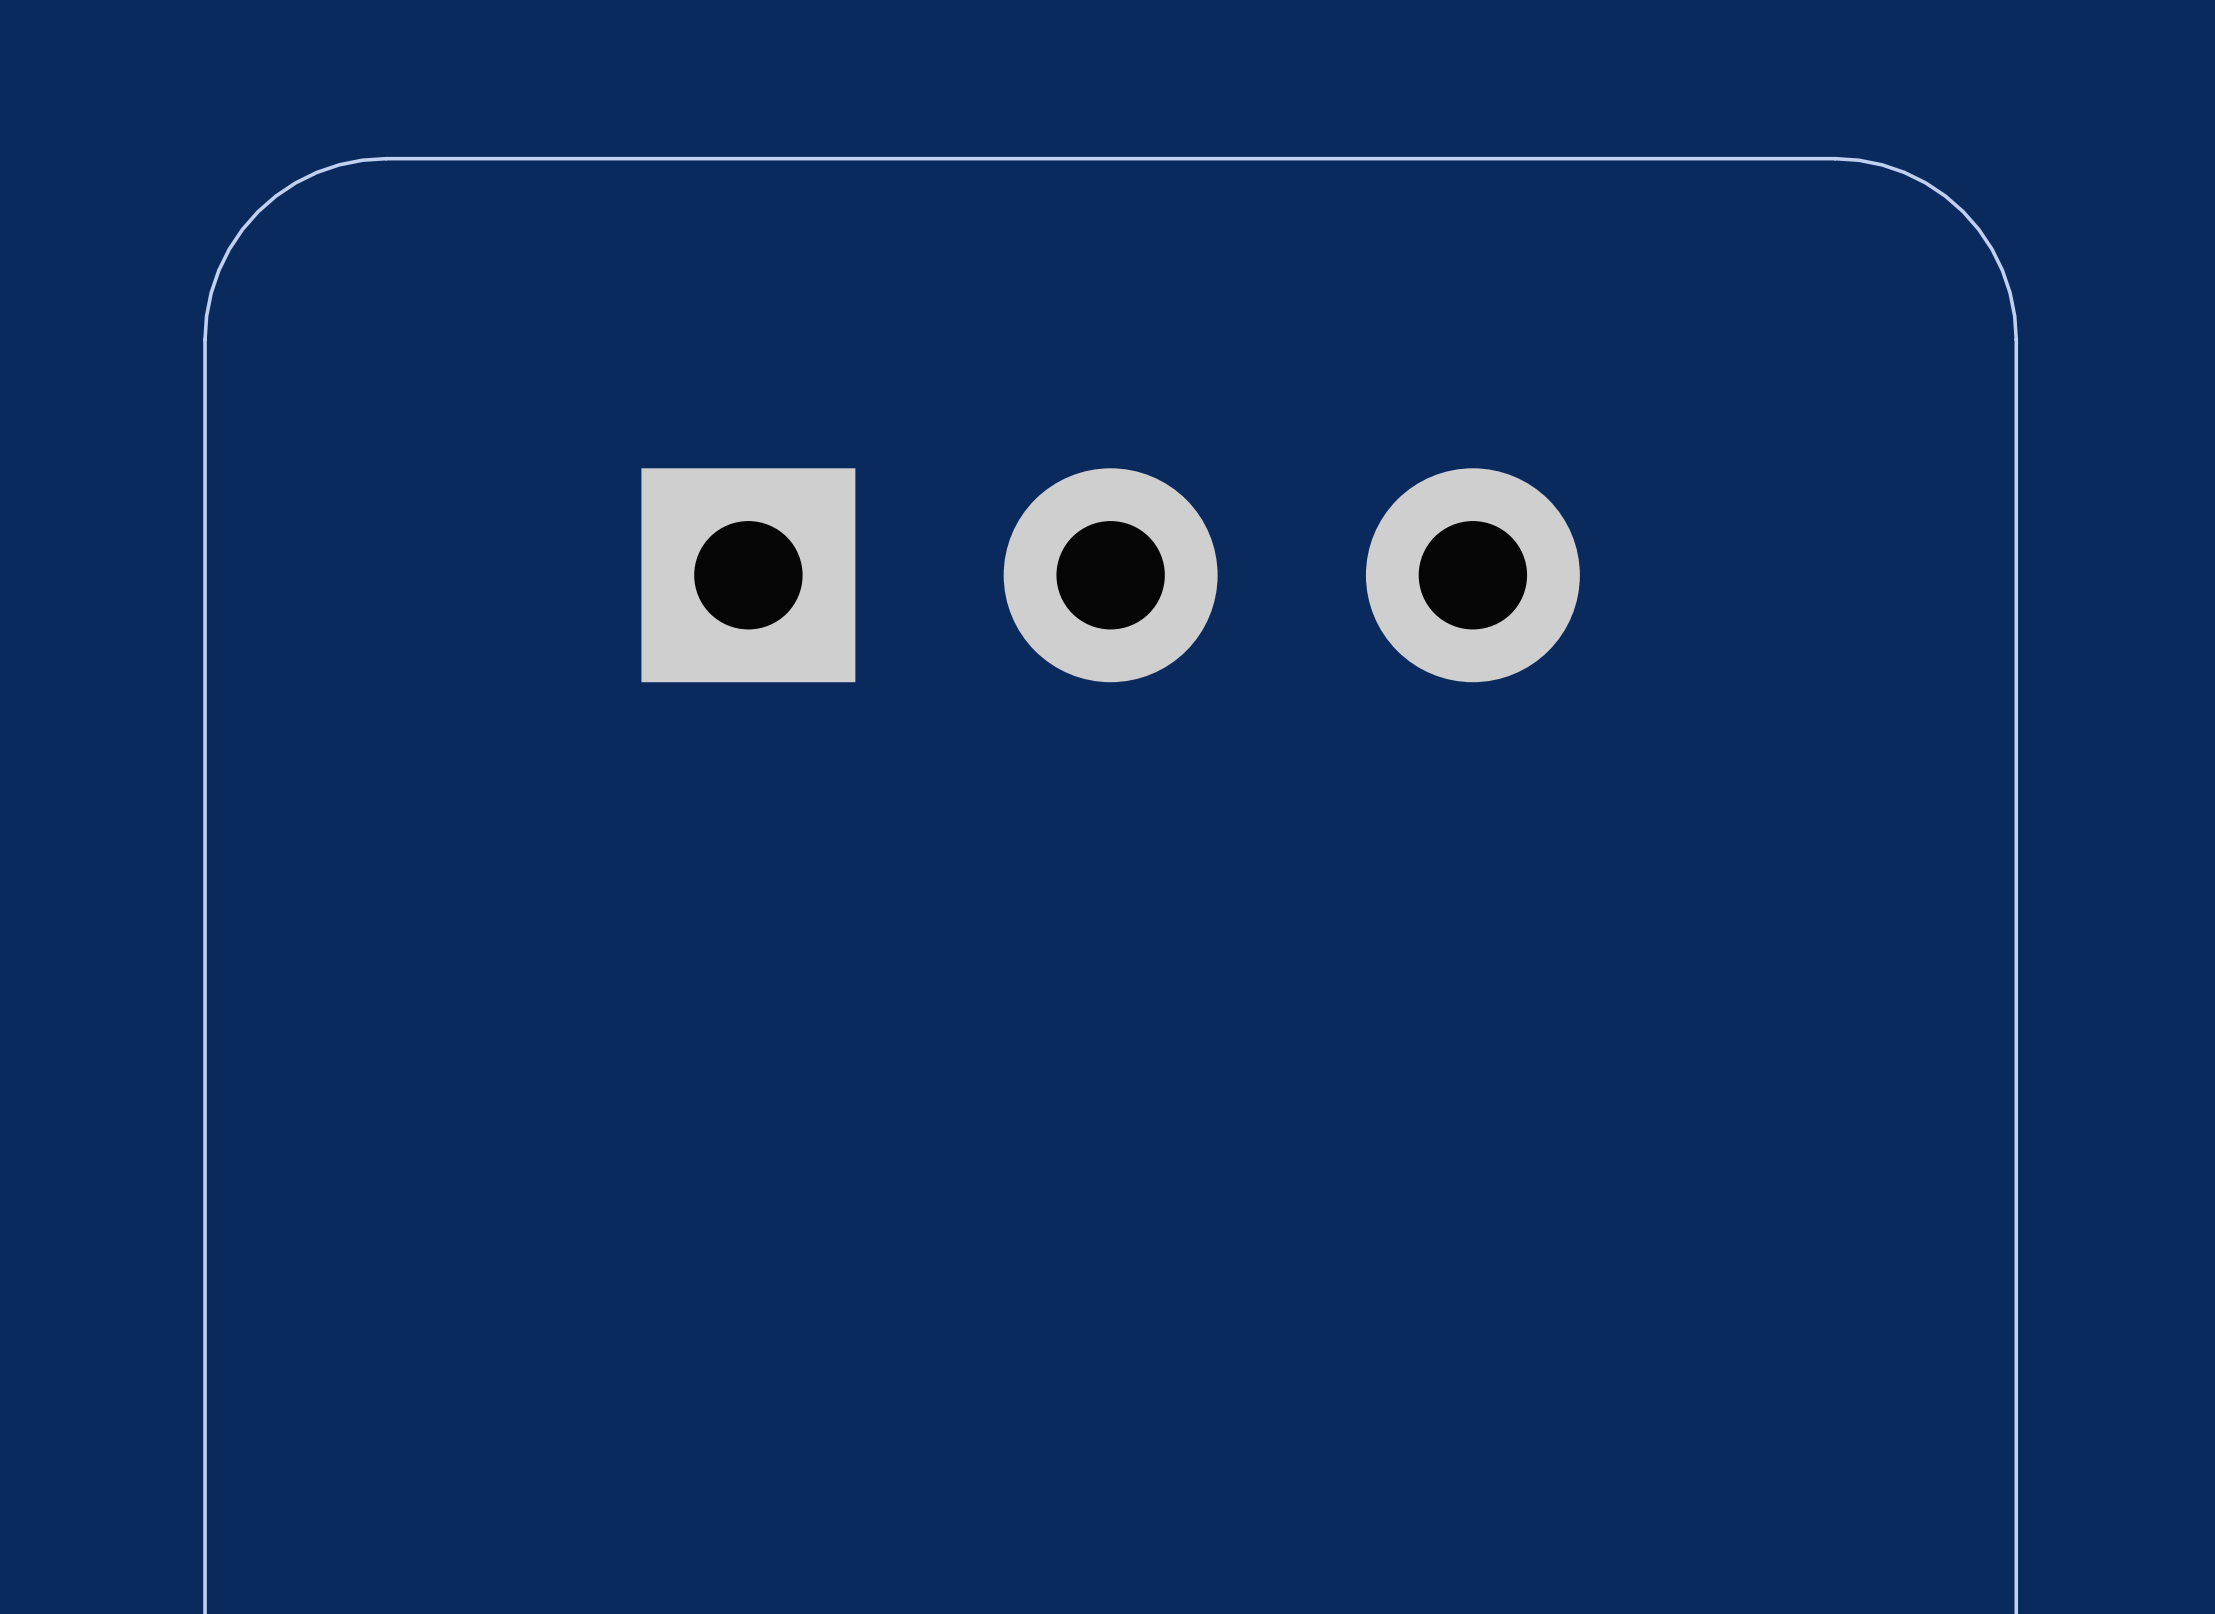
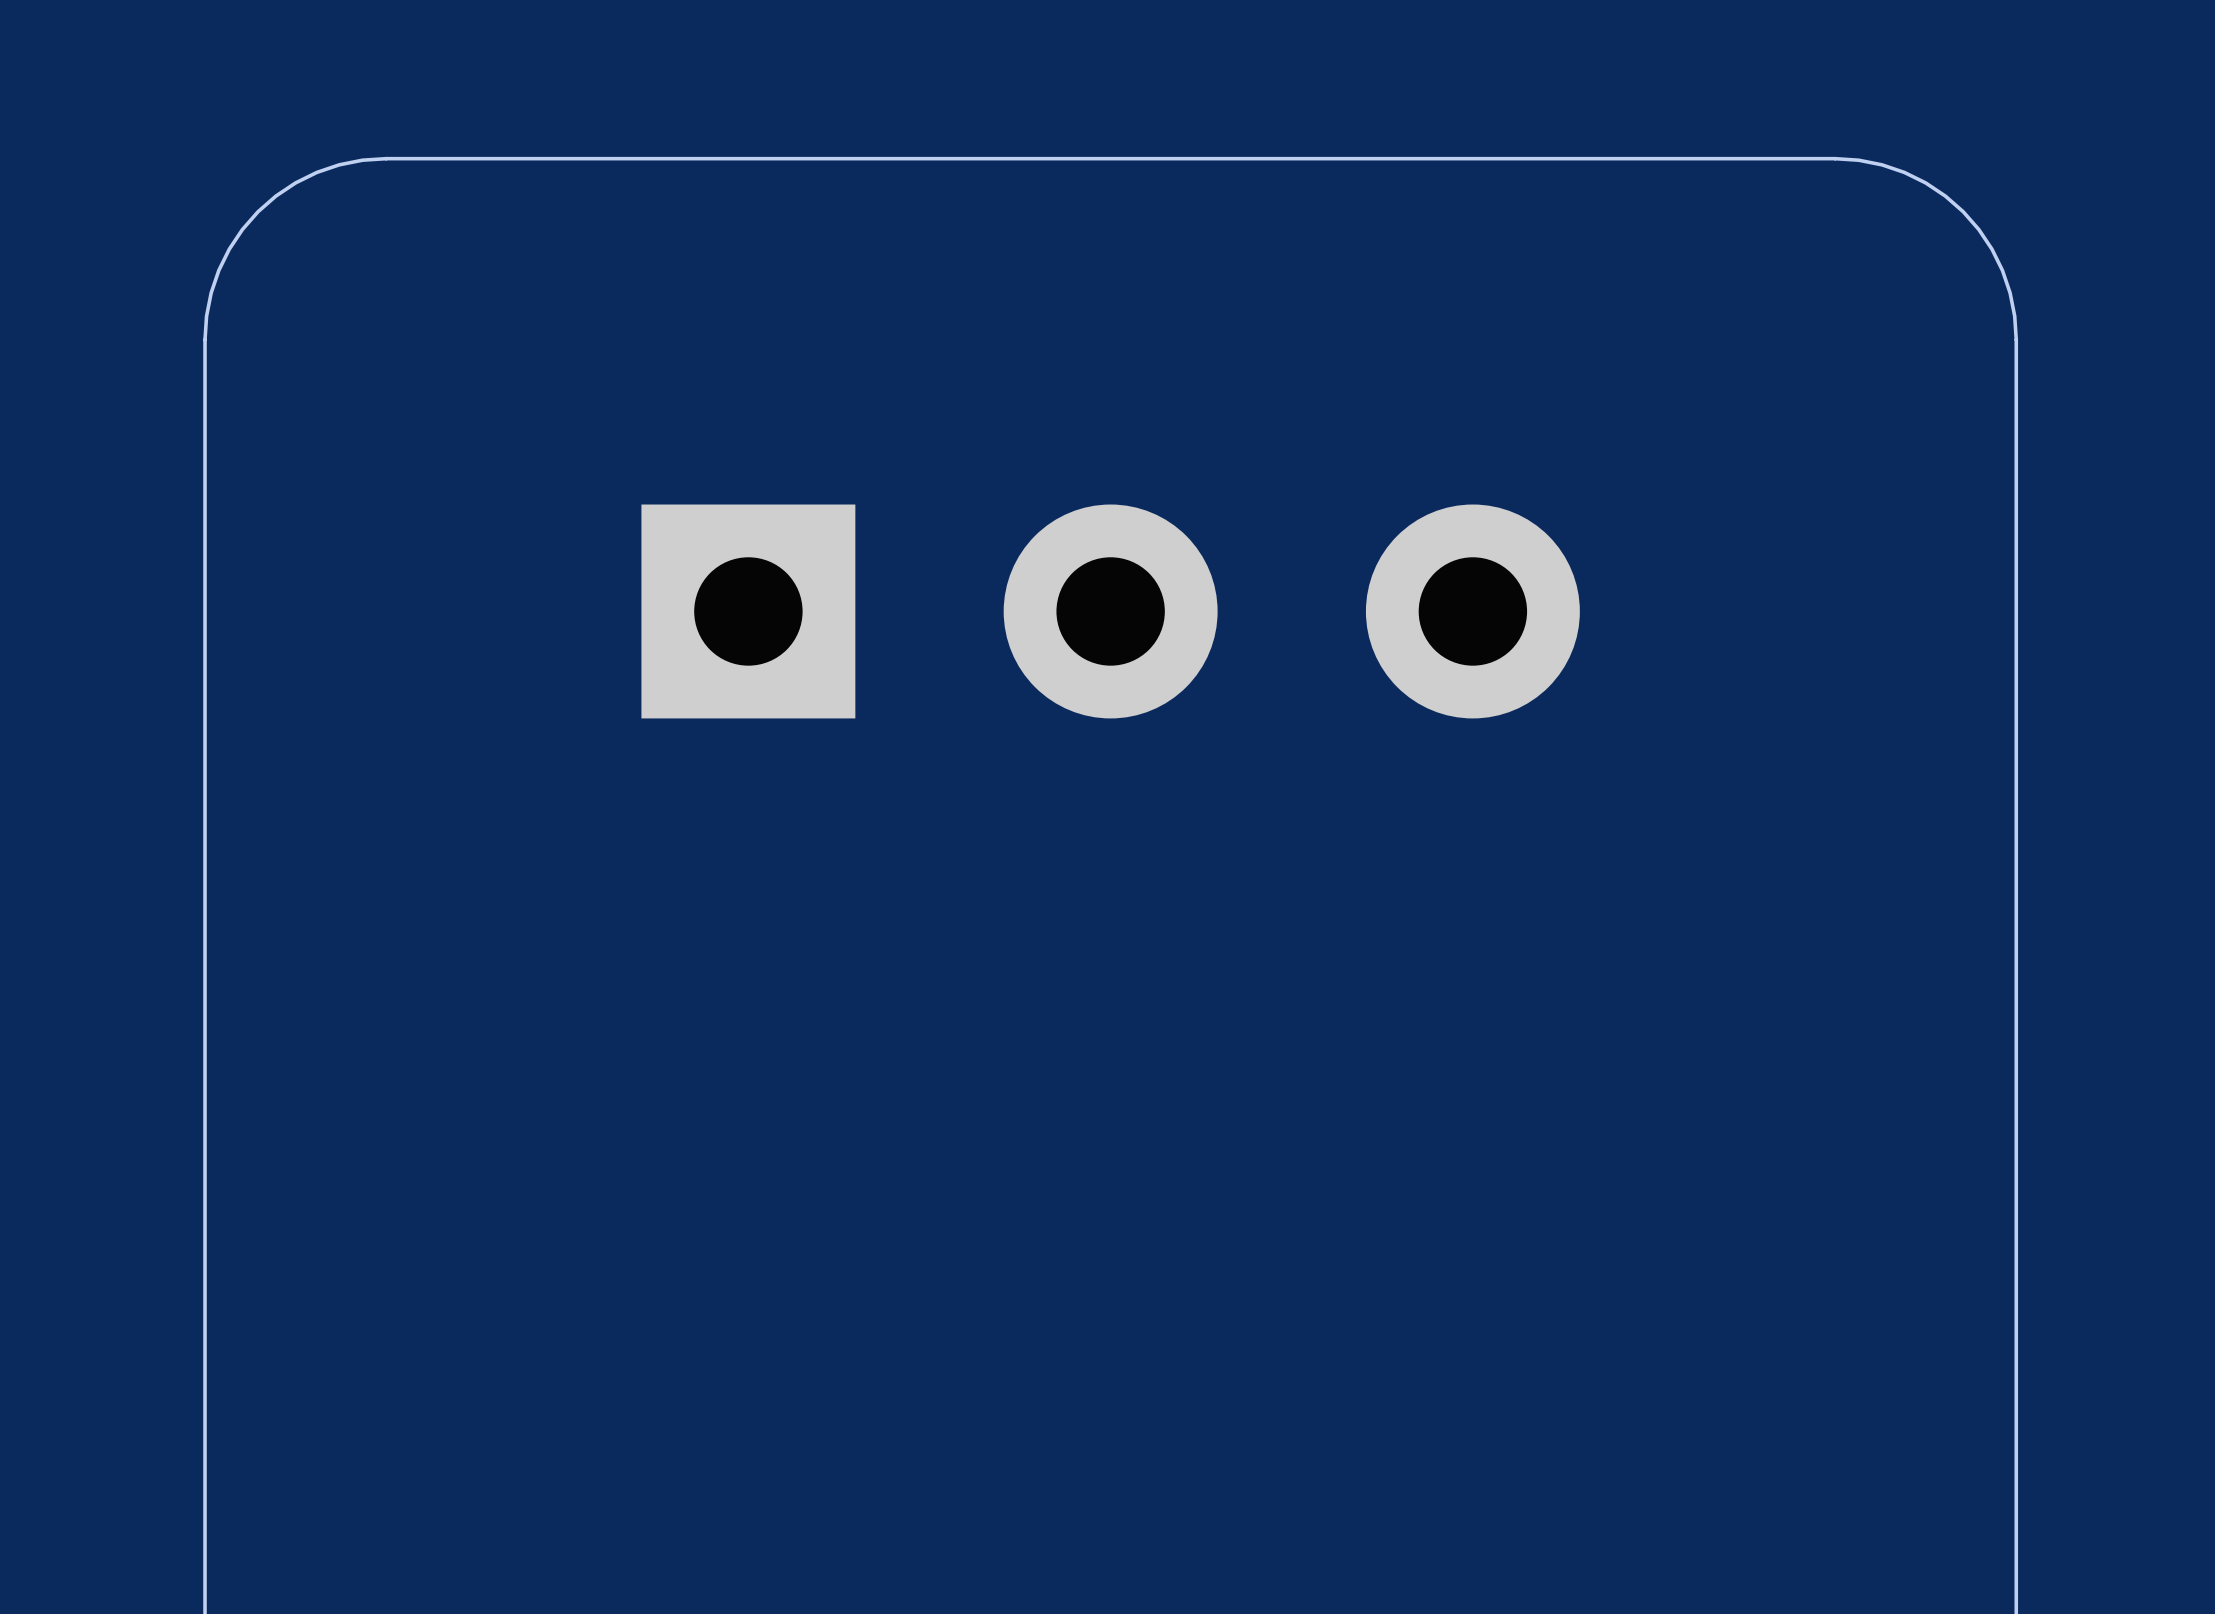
part position: (1110, 575) -> (1110, 611)

